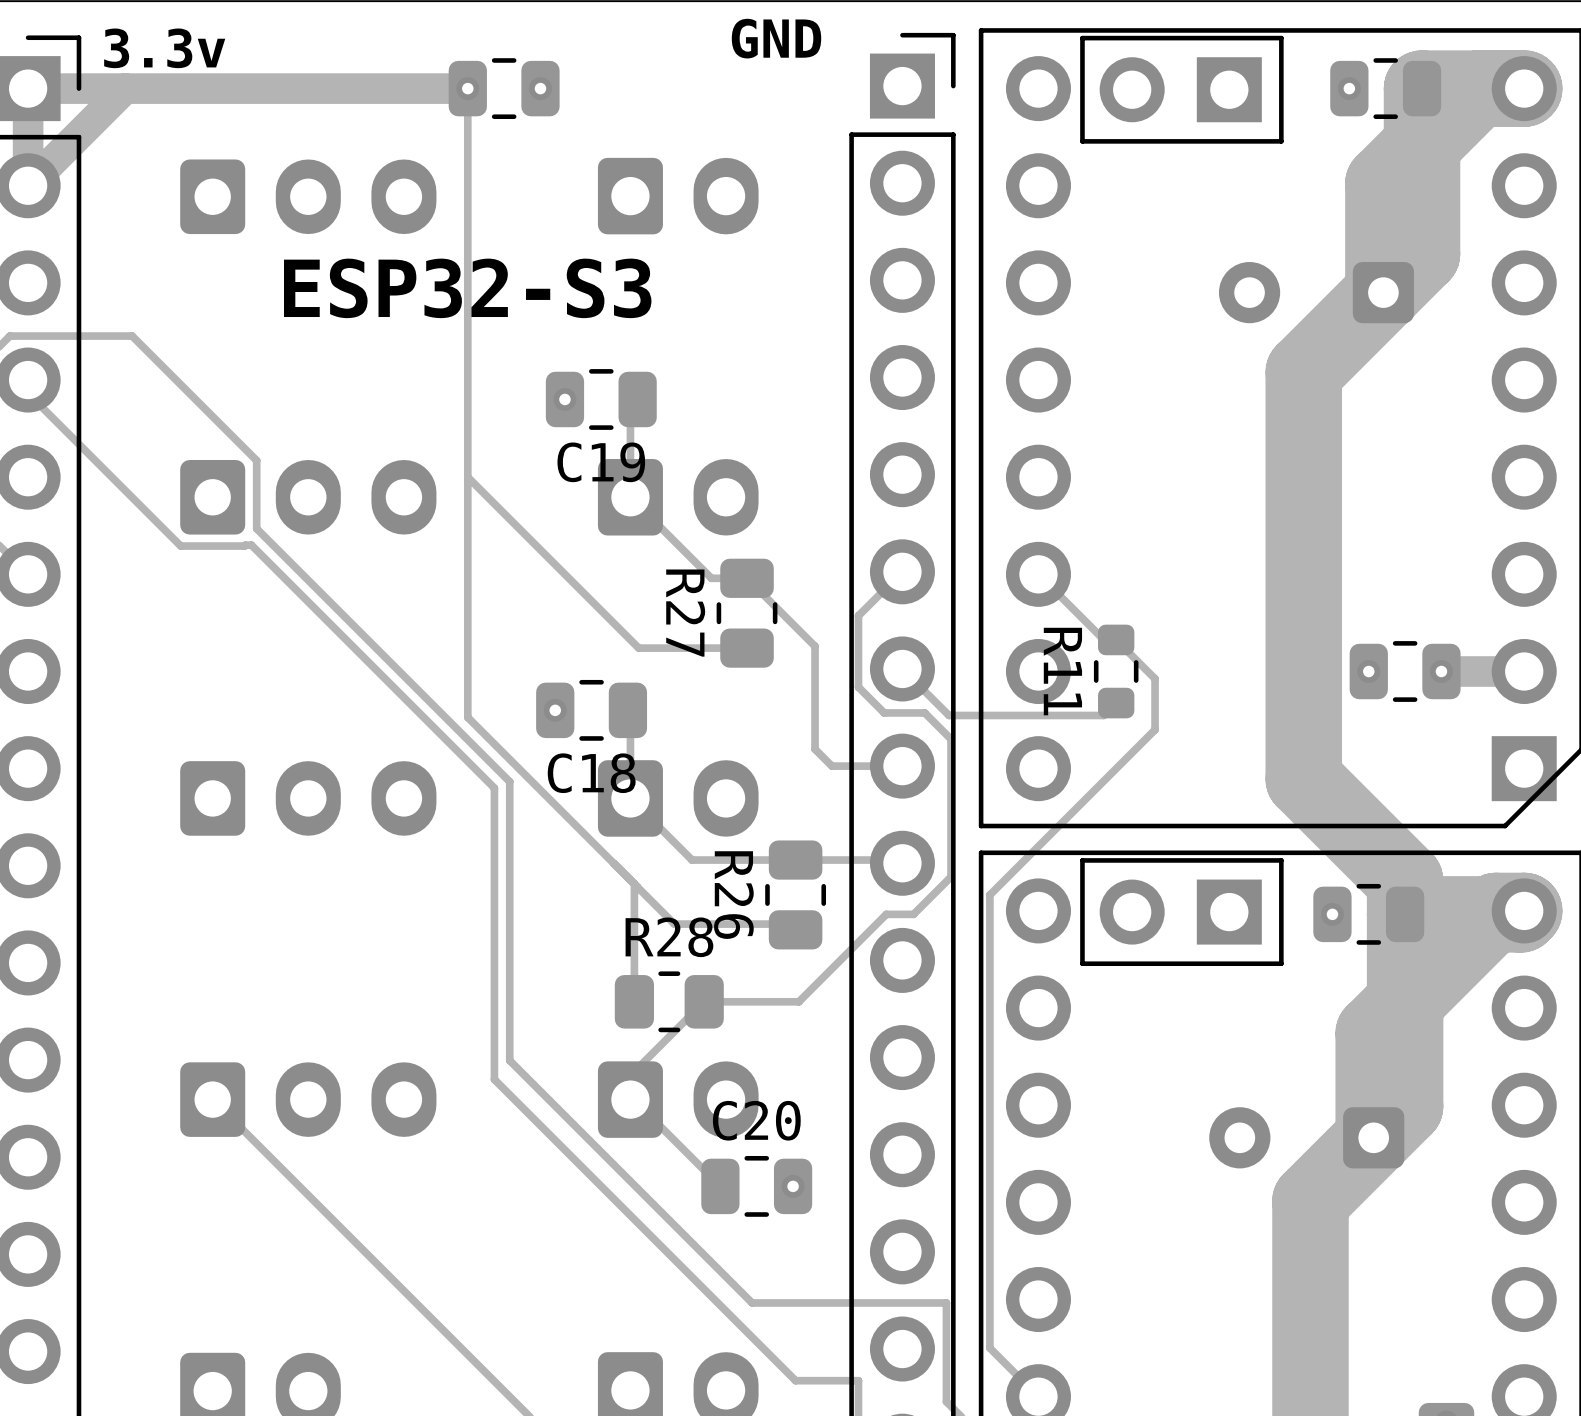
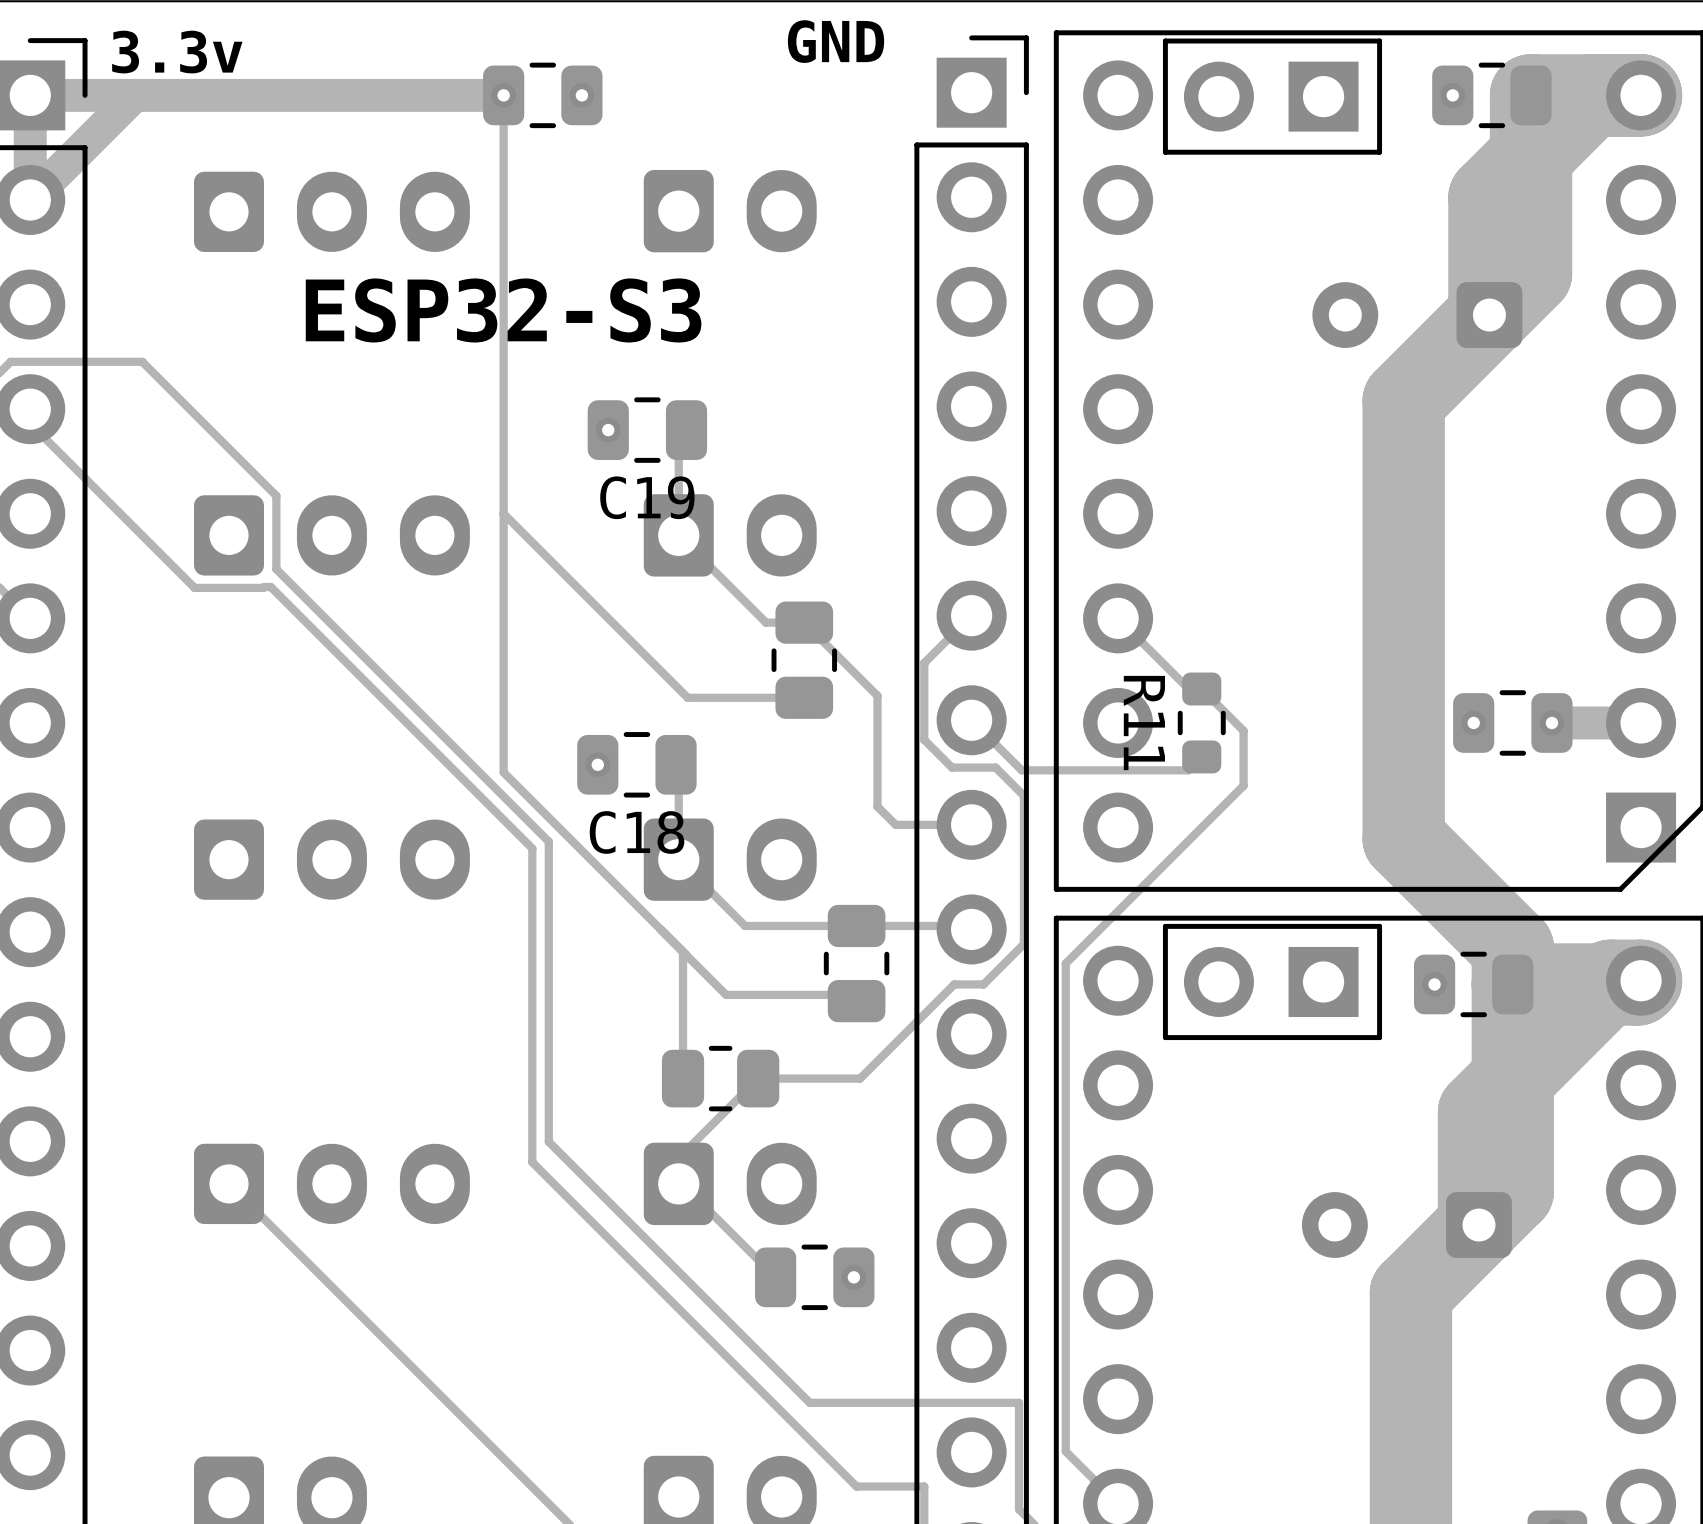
R27 name: R27 (685, 613) -> none
R26 name: R26 (733, 895) -> none
R28 name: R28 (669, 937) -> none
C20 name: C20 (756, 1120) -> none

